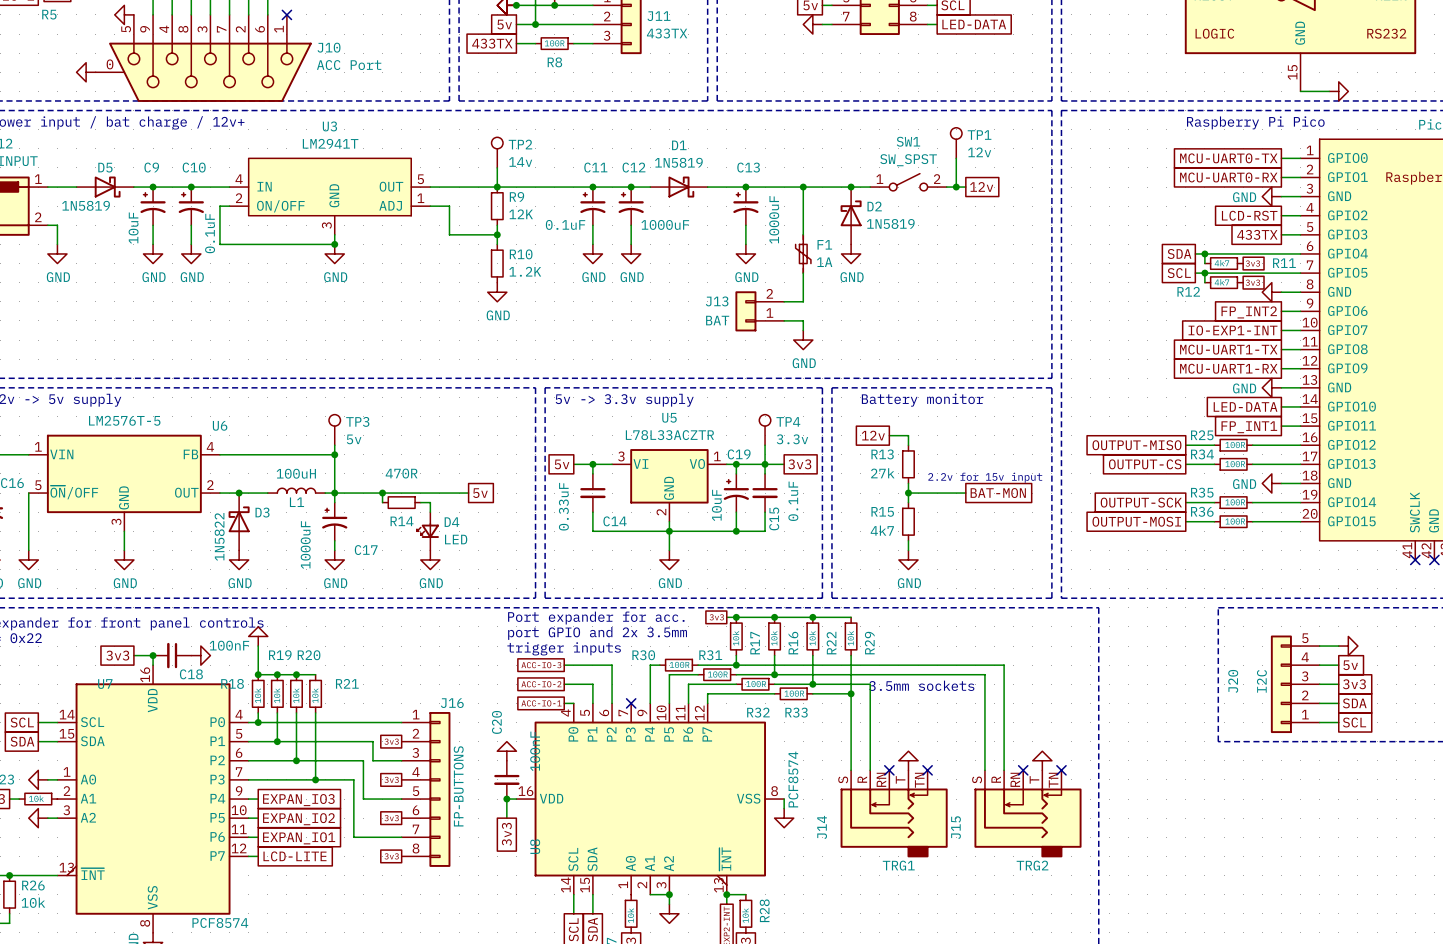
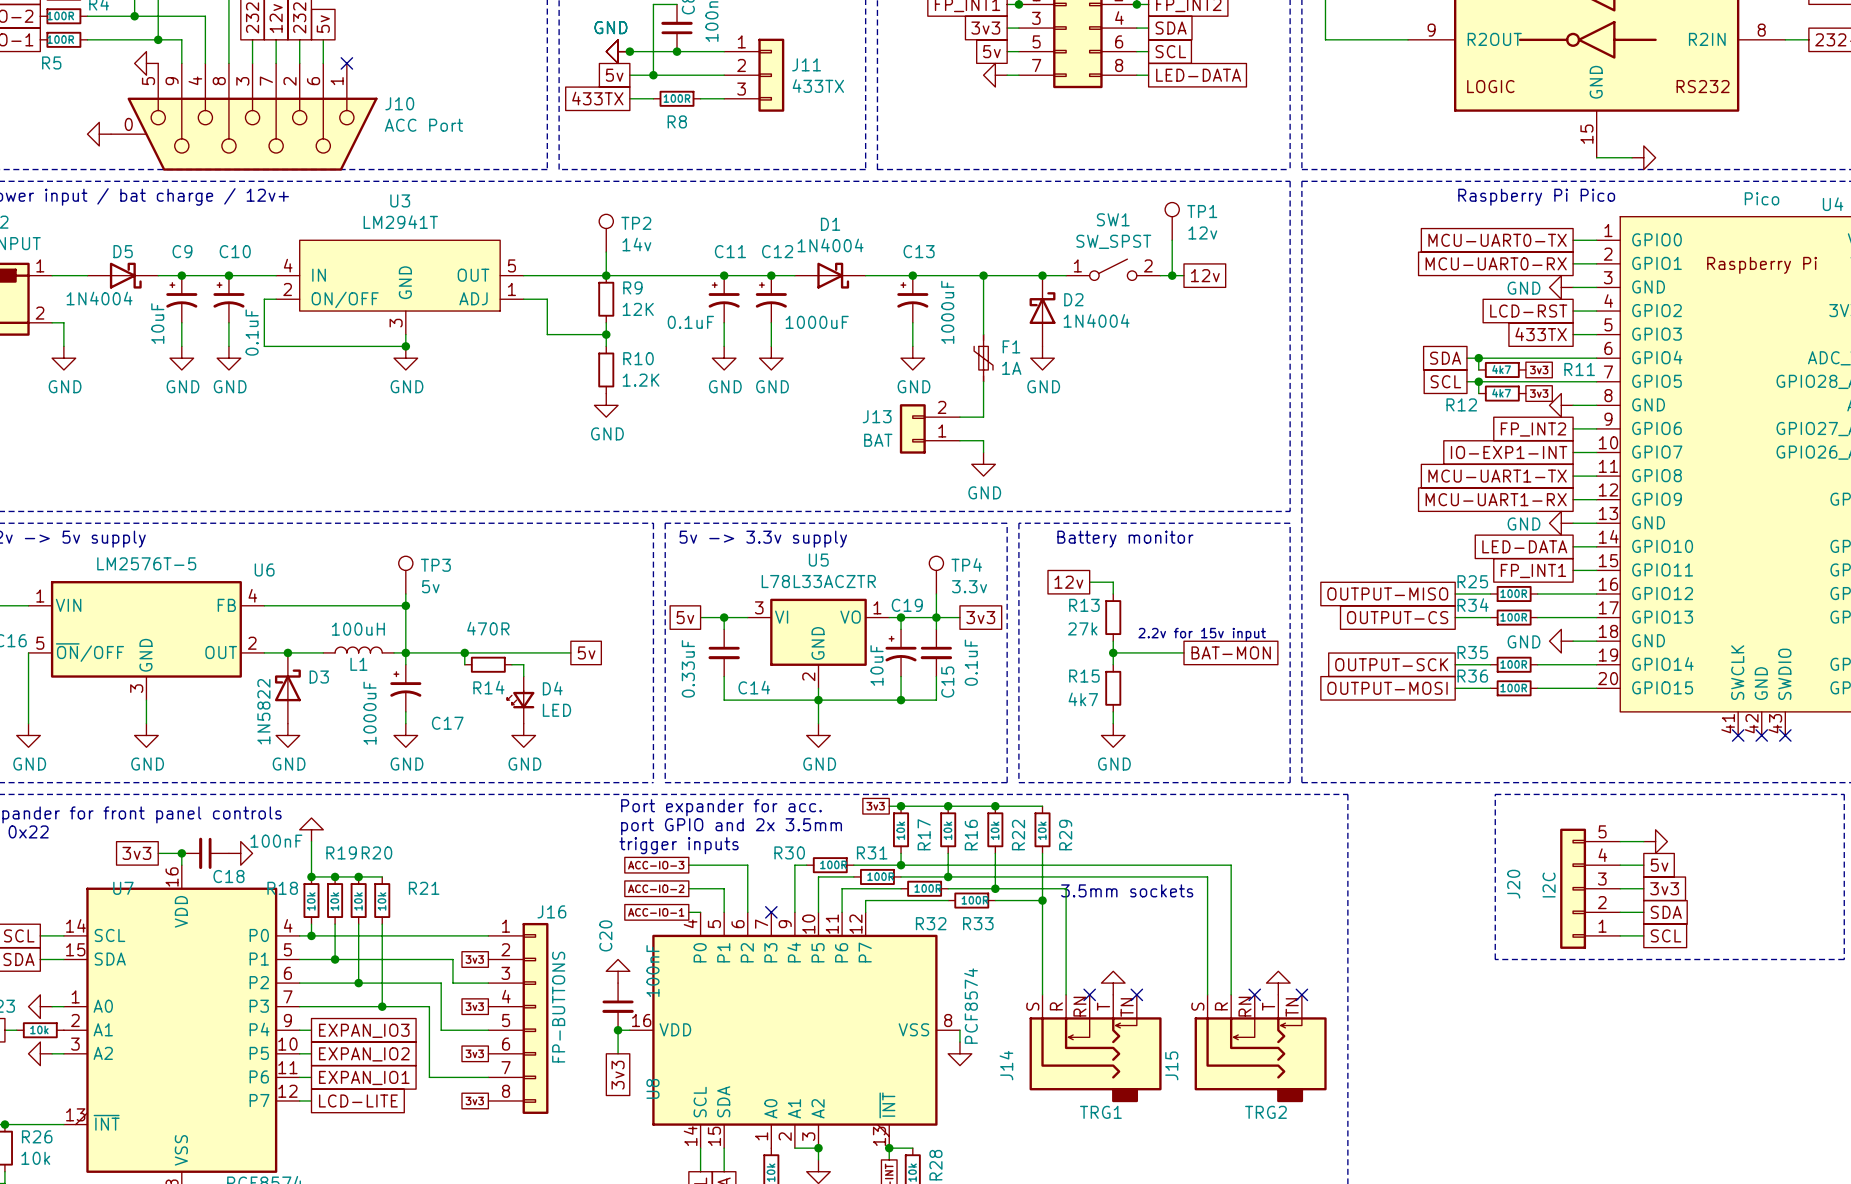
D1 value: 1N5819 (678, 162) -> 1N4004 (830, 245)
D5 value: 1N5819 (86, 205) -> 1N4004 (99, 298)
D2 value: 1N5819 (890, 223) -> 1N4004 (1096, 320)

